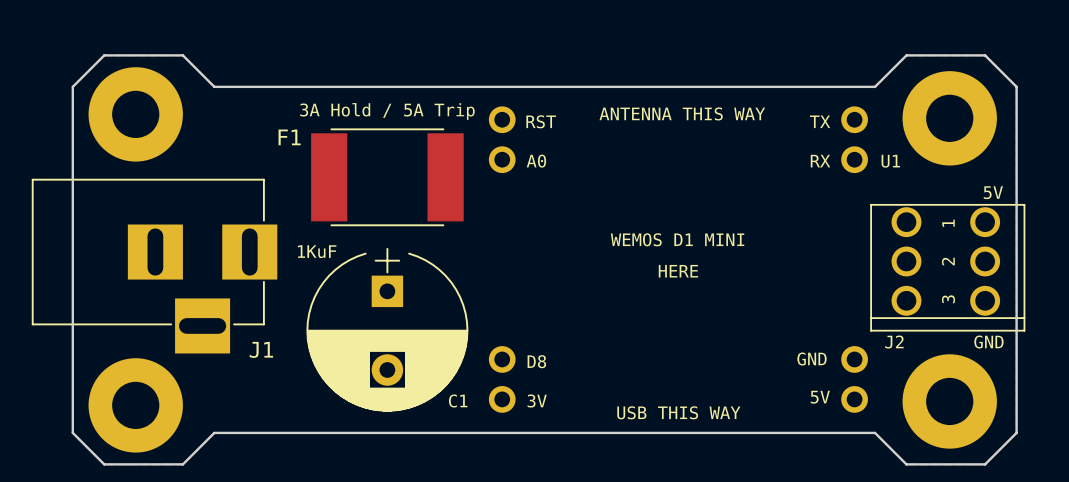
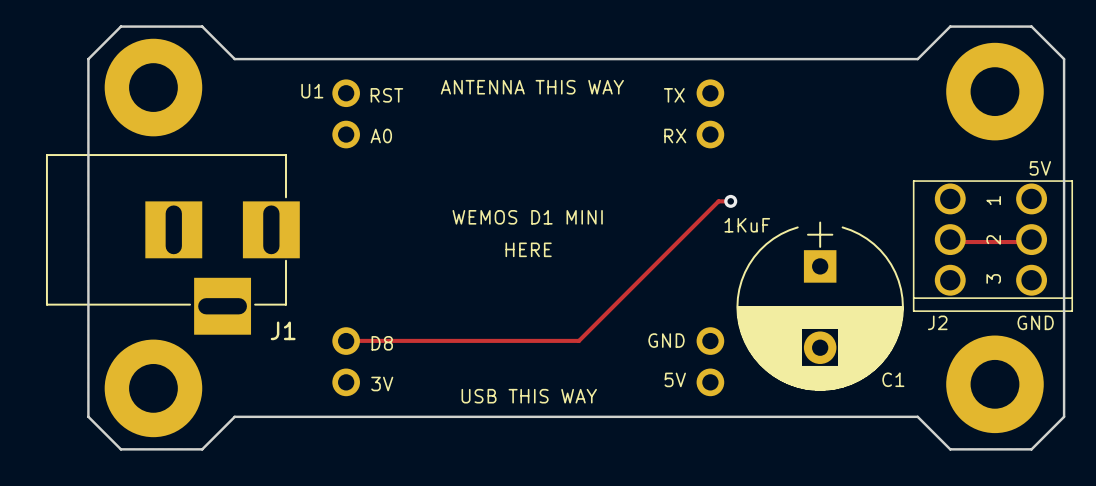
U1 name position: U1 (890, 161) -> U1 (312, 91)
F1: 3A Hold / 5A Trip (387, 177) -> none
track: none -> (730, 201) (718, 201) (579, 340) (345, 340)
via: none -> (730, 201)
U1 position: (678, 259) -> (528, 237)
track: none -> (950, 242) (1031, 242)
C1 position: (387, 329) -> (820, 306)

